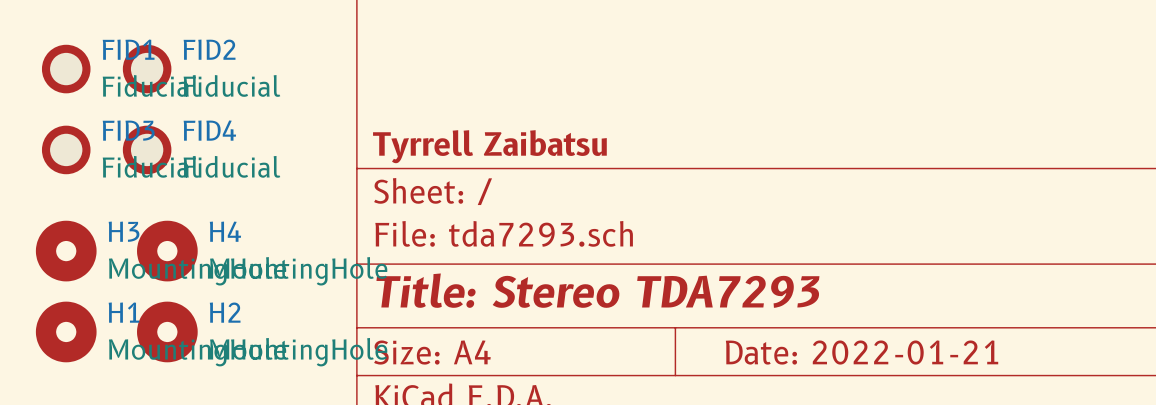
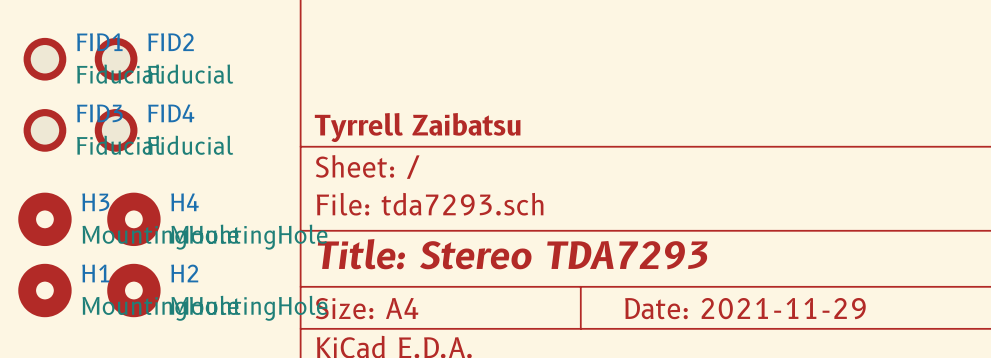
title block: Date: 2022-01-21 (862, 352) -> Date: 2021-11-29 (745, 308)

